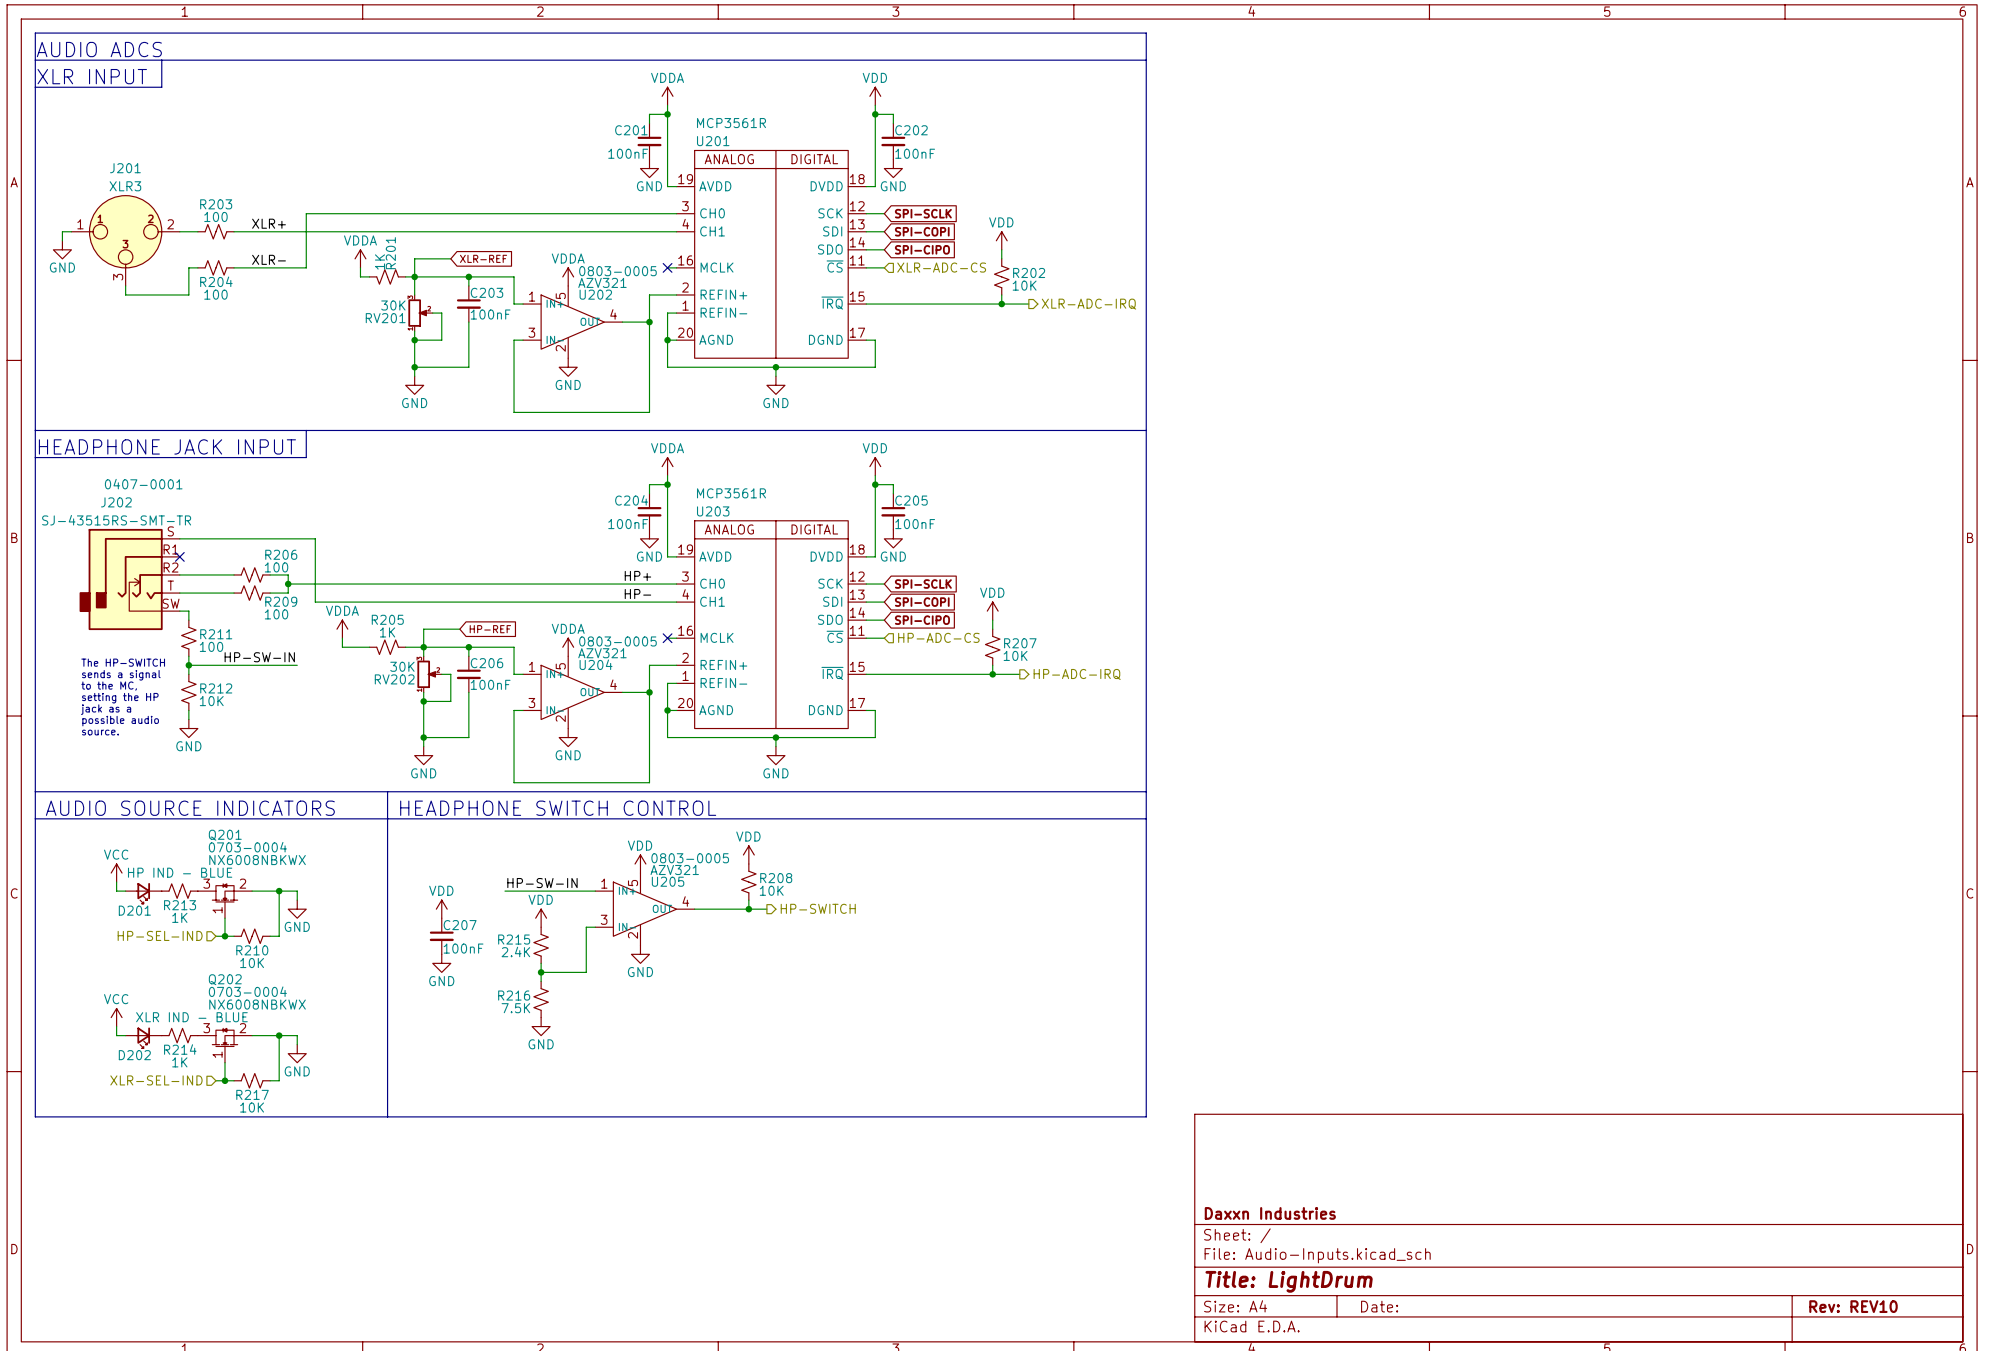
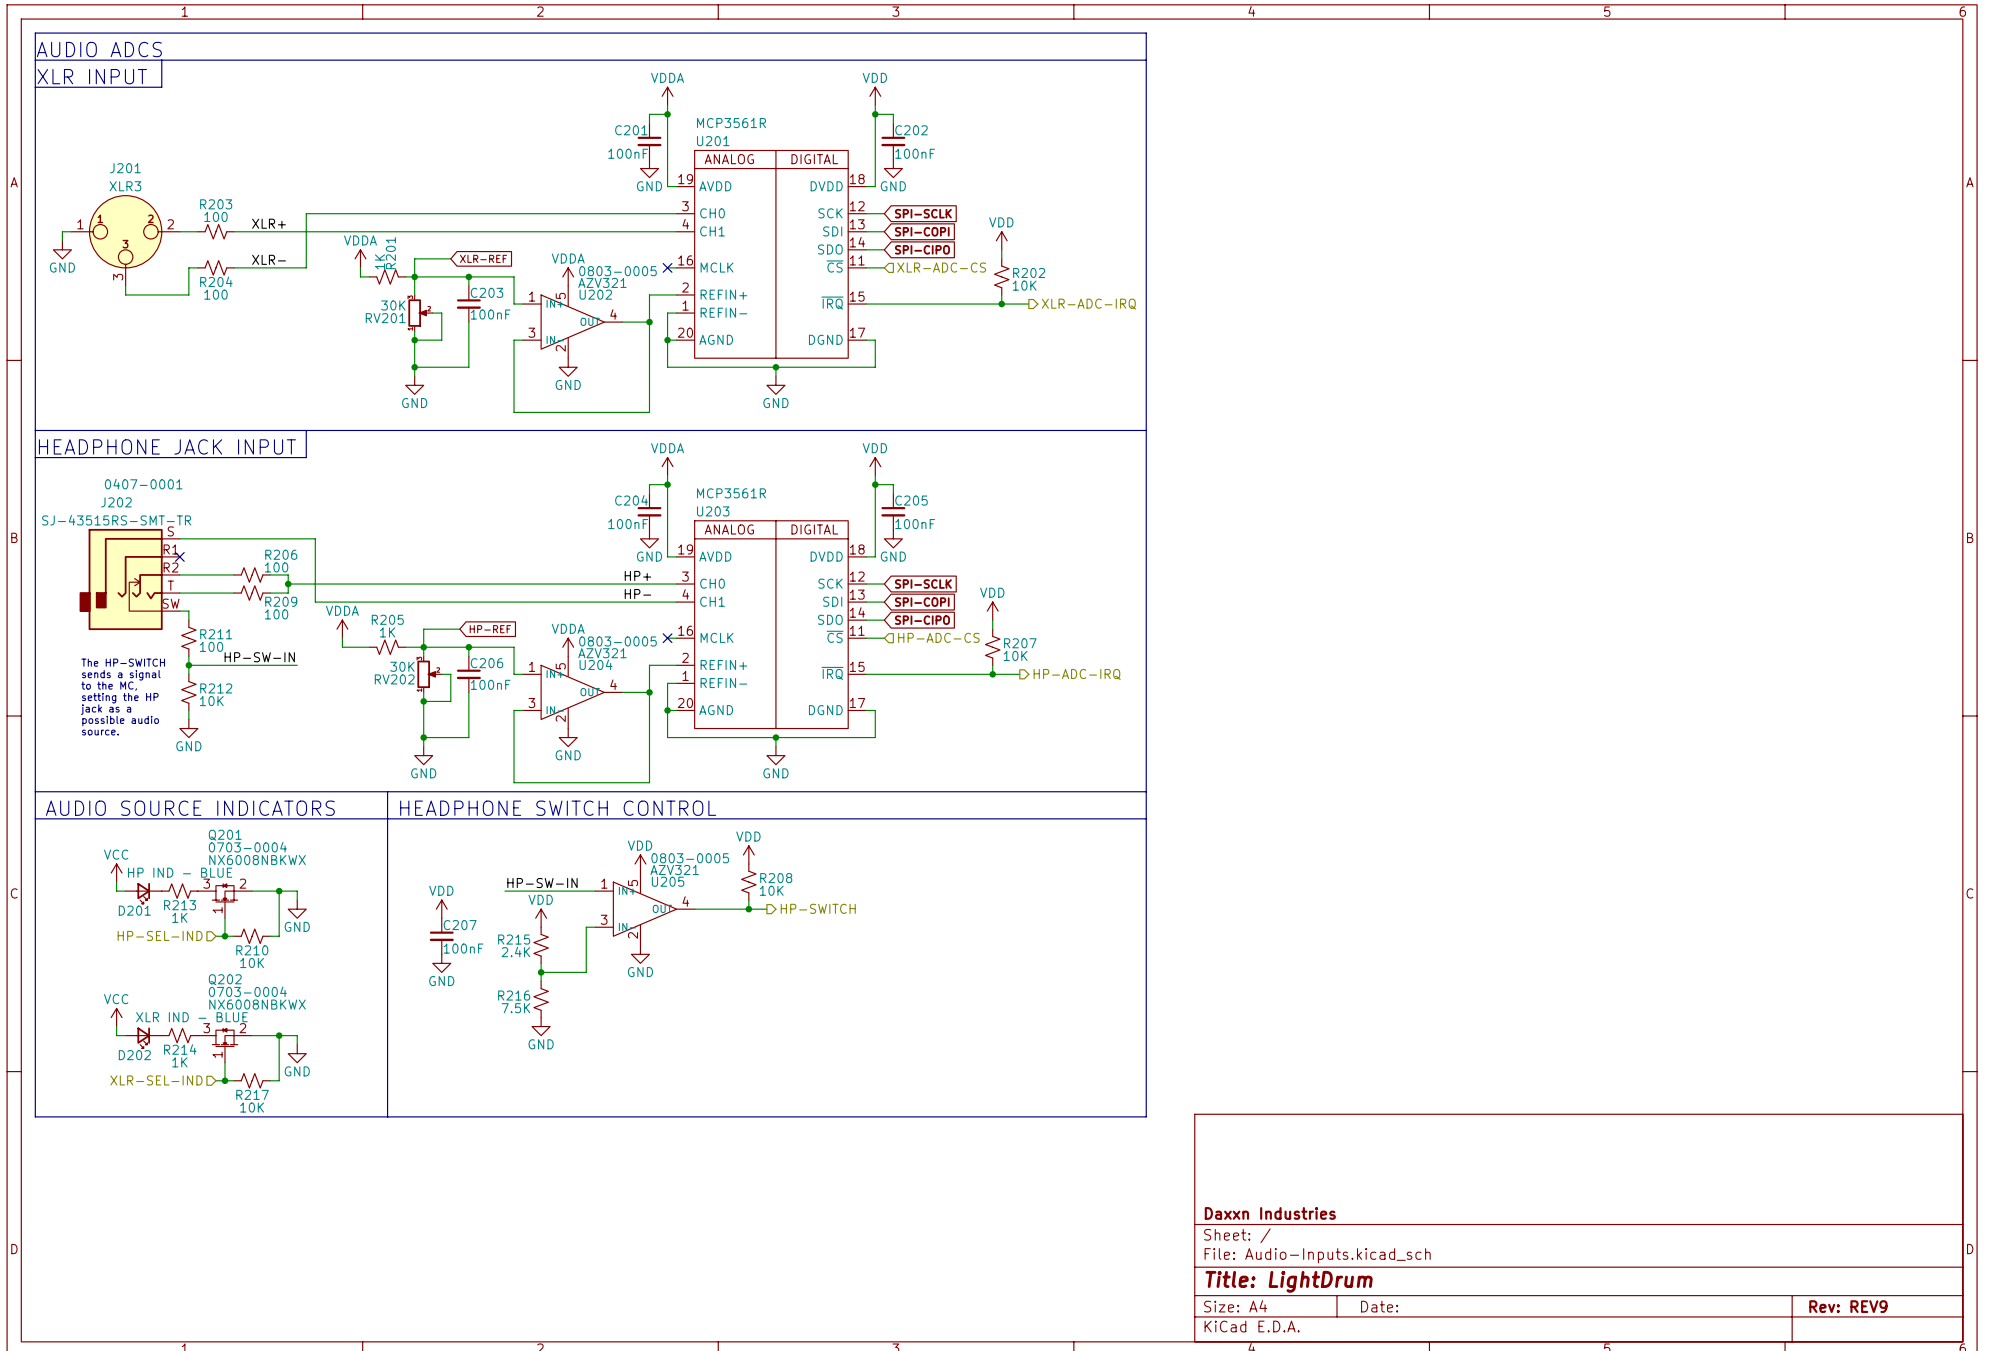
title block: Rev: REV10 (1853, 1306) -> Rev: REV9 (1848, 1306)

